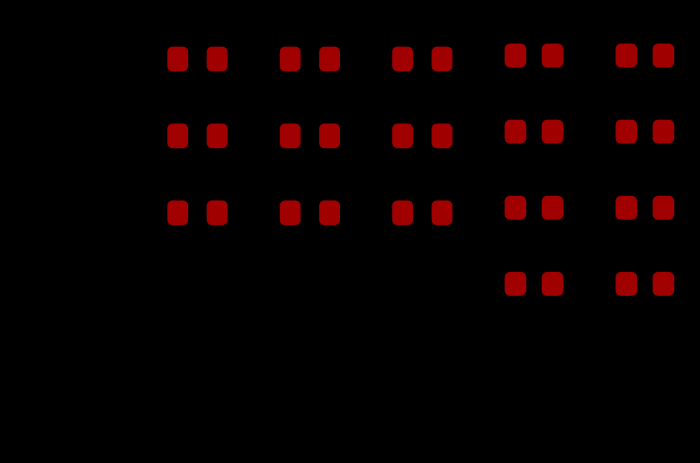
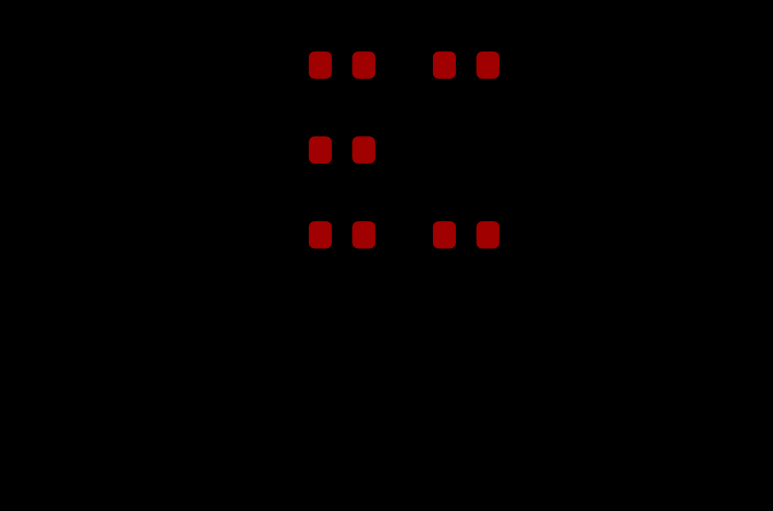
part: (533, 55) -> none
part: (644, 55) -> none
part: (197, 58) -> none
part: (533, 131) -> none
part: (644, 131) -> none
part: (197, 135) -> none
part: (422, 135) -> none
part: (533, 207) -> none
part: (644, 207) -> none
part: (197, 212) -> none
part: (533, 283) -> none
part: (644, 283) -> none

